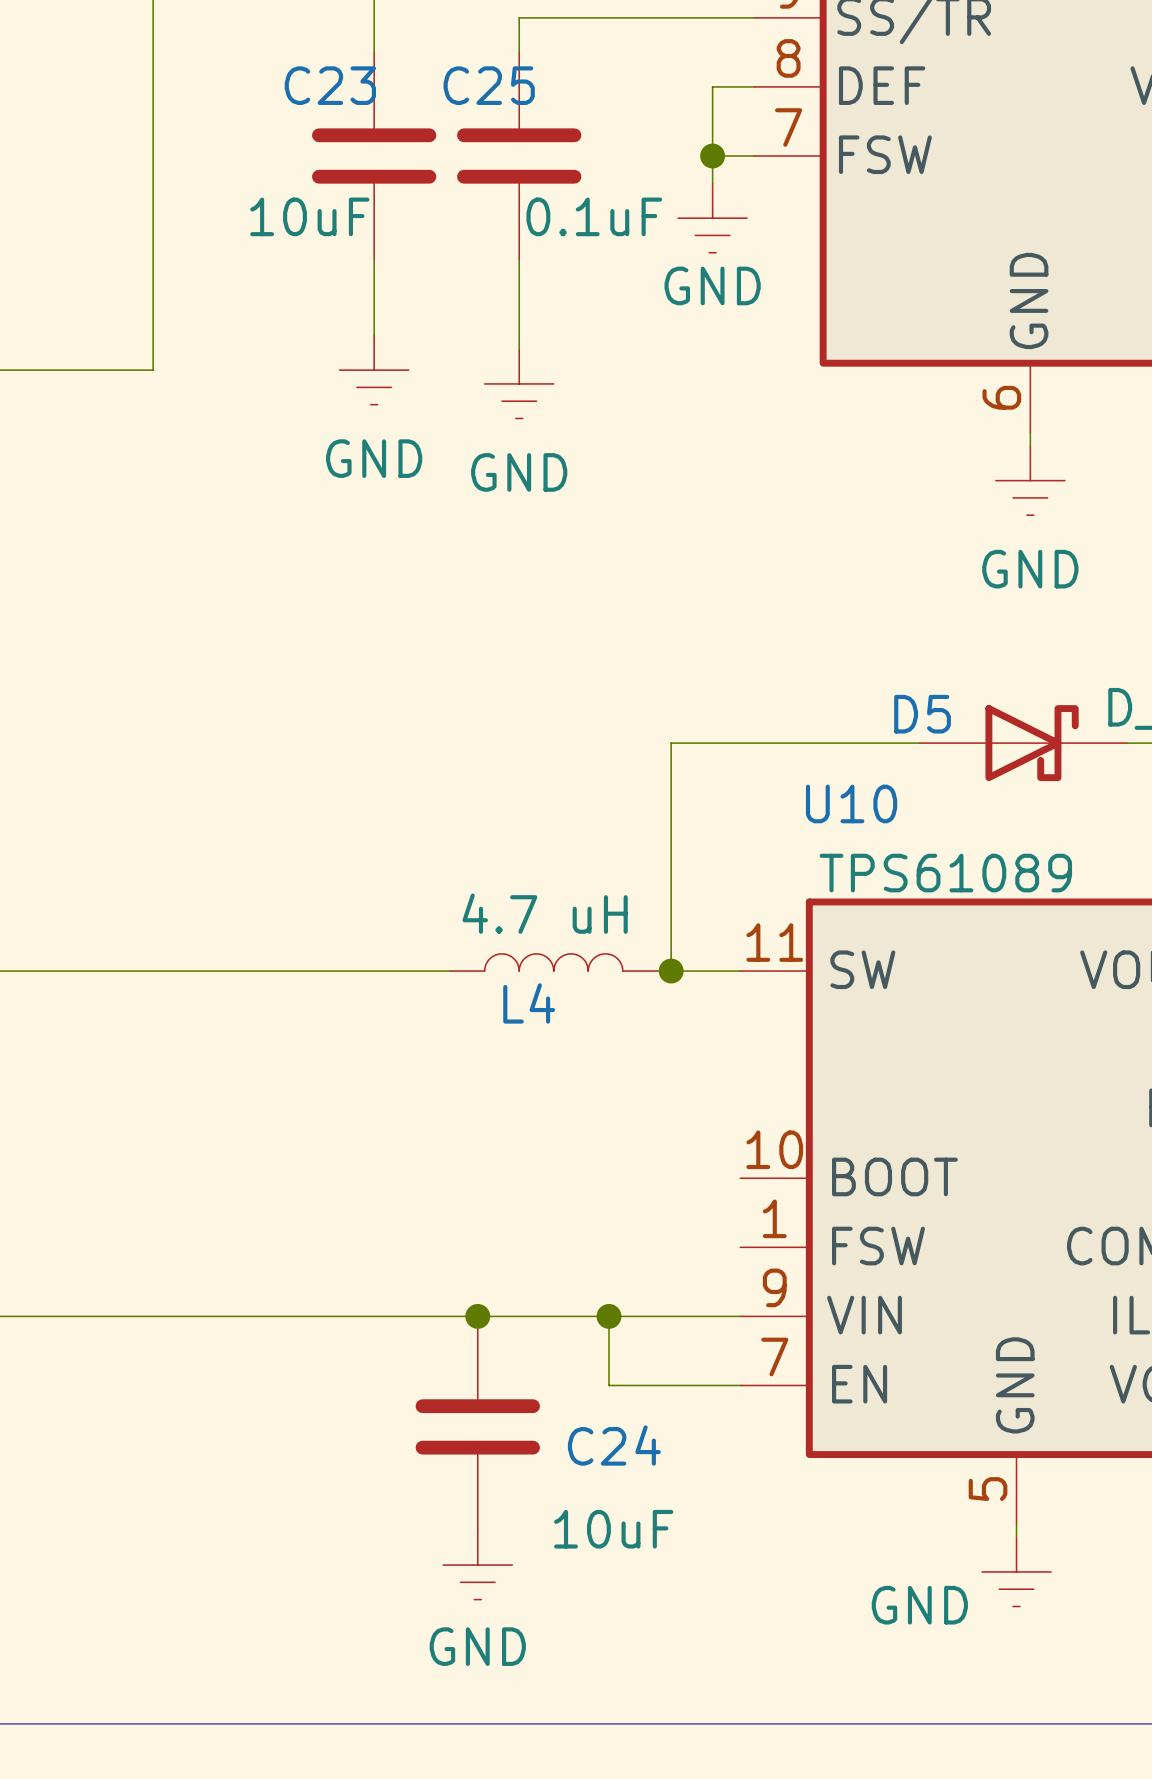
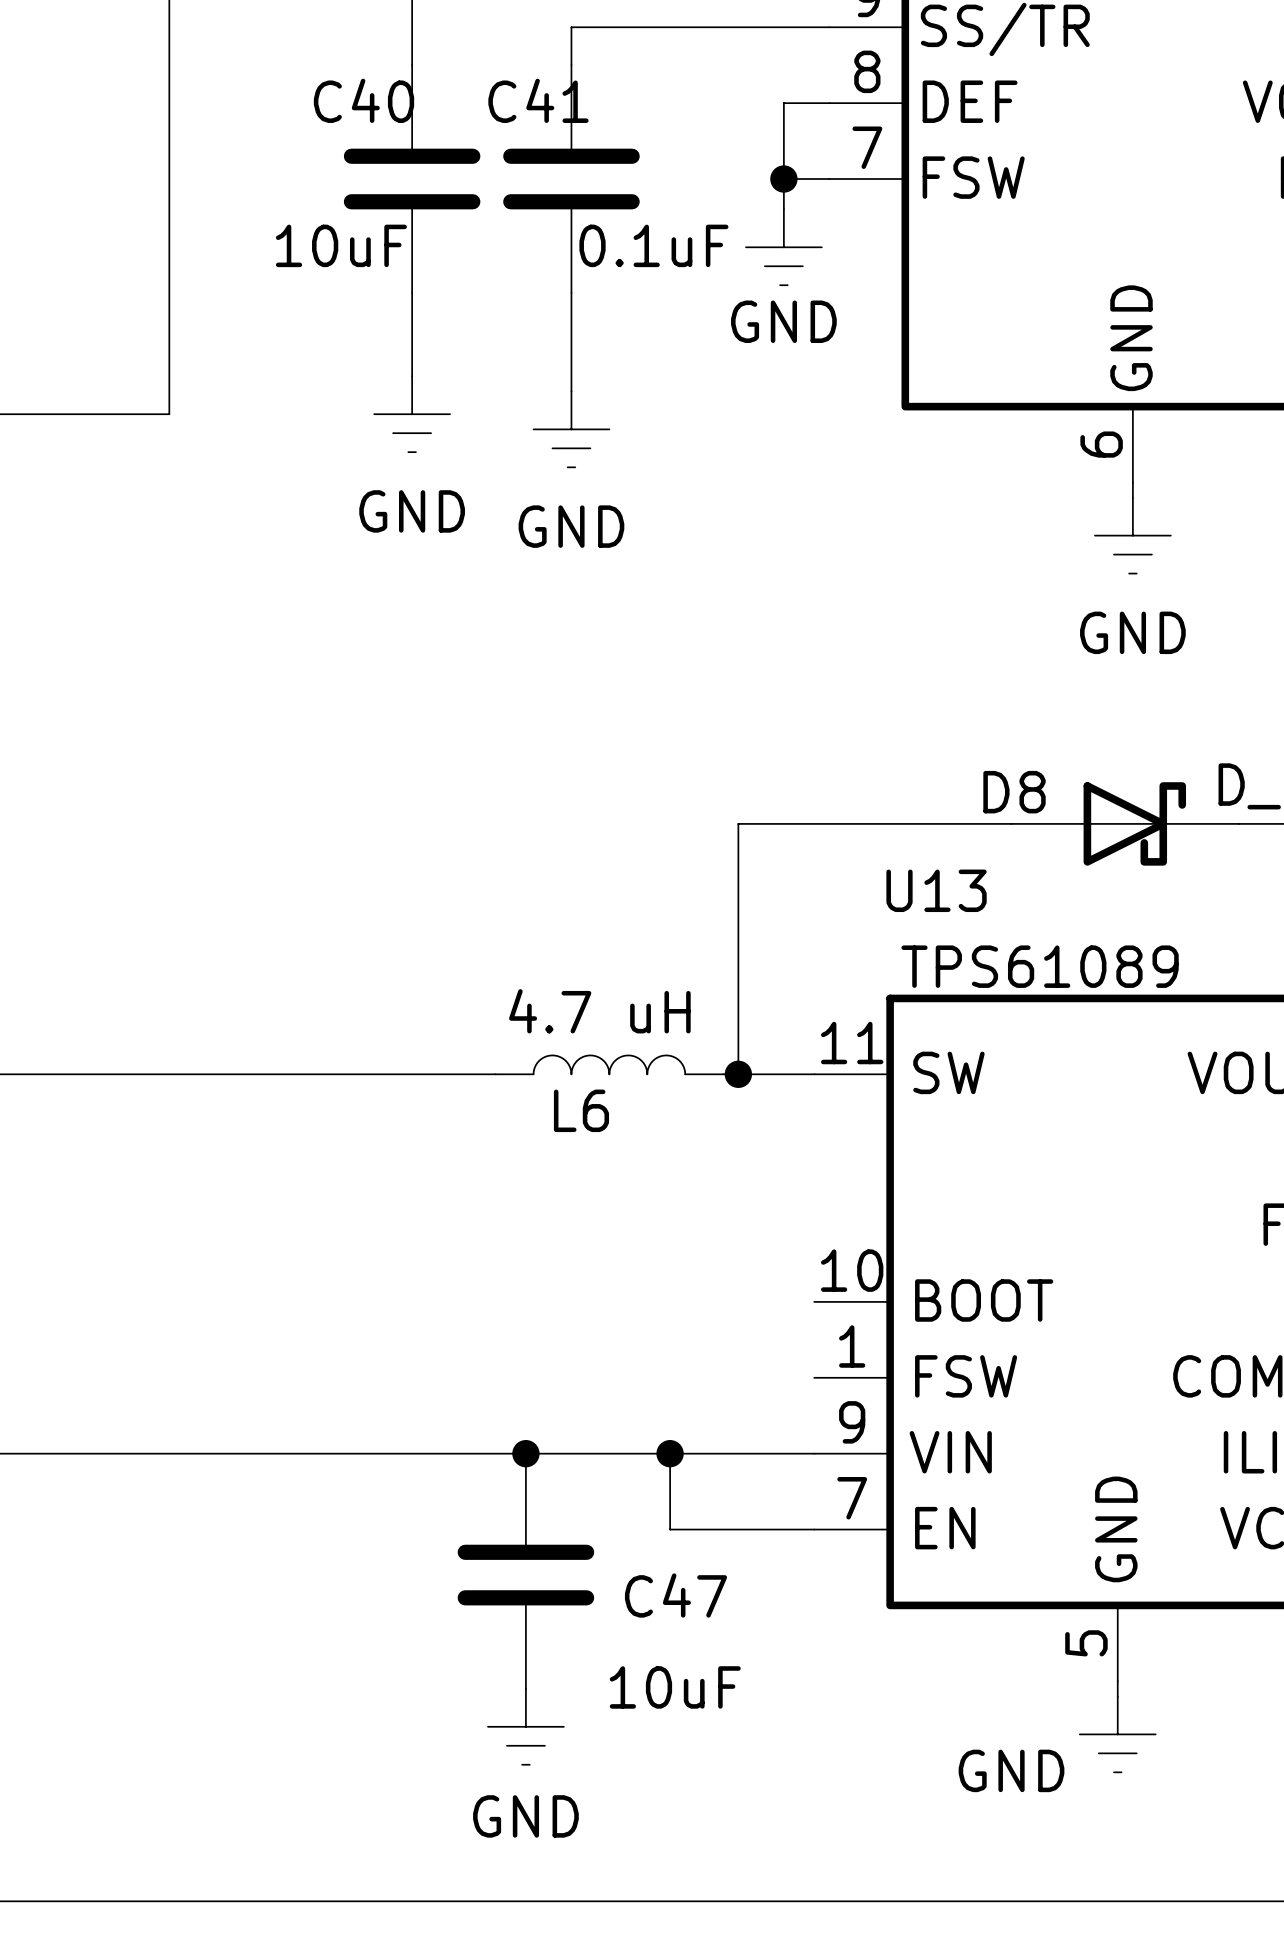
C23 name: C23 (330, 85) -> C40 (363, 100)
C25 name: C25 (489, 85) -> C41 (538, 100)
D5 name: D5 (922, 714) -> D8 (1014, 792)
U10 name: U10 (851, 803) -> U13 (936, 890)
L4 name: L4 (529, 1003) -> L6 (581, 1110)
C24 name: C24 (614, 1445) -> C47 (675, 1595)

